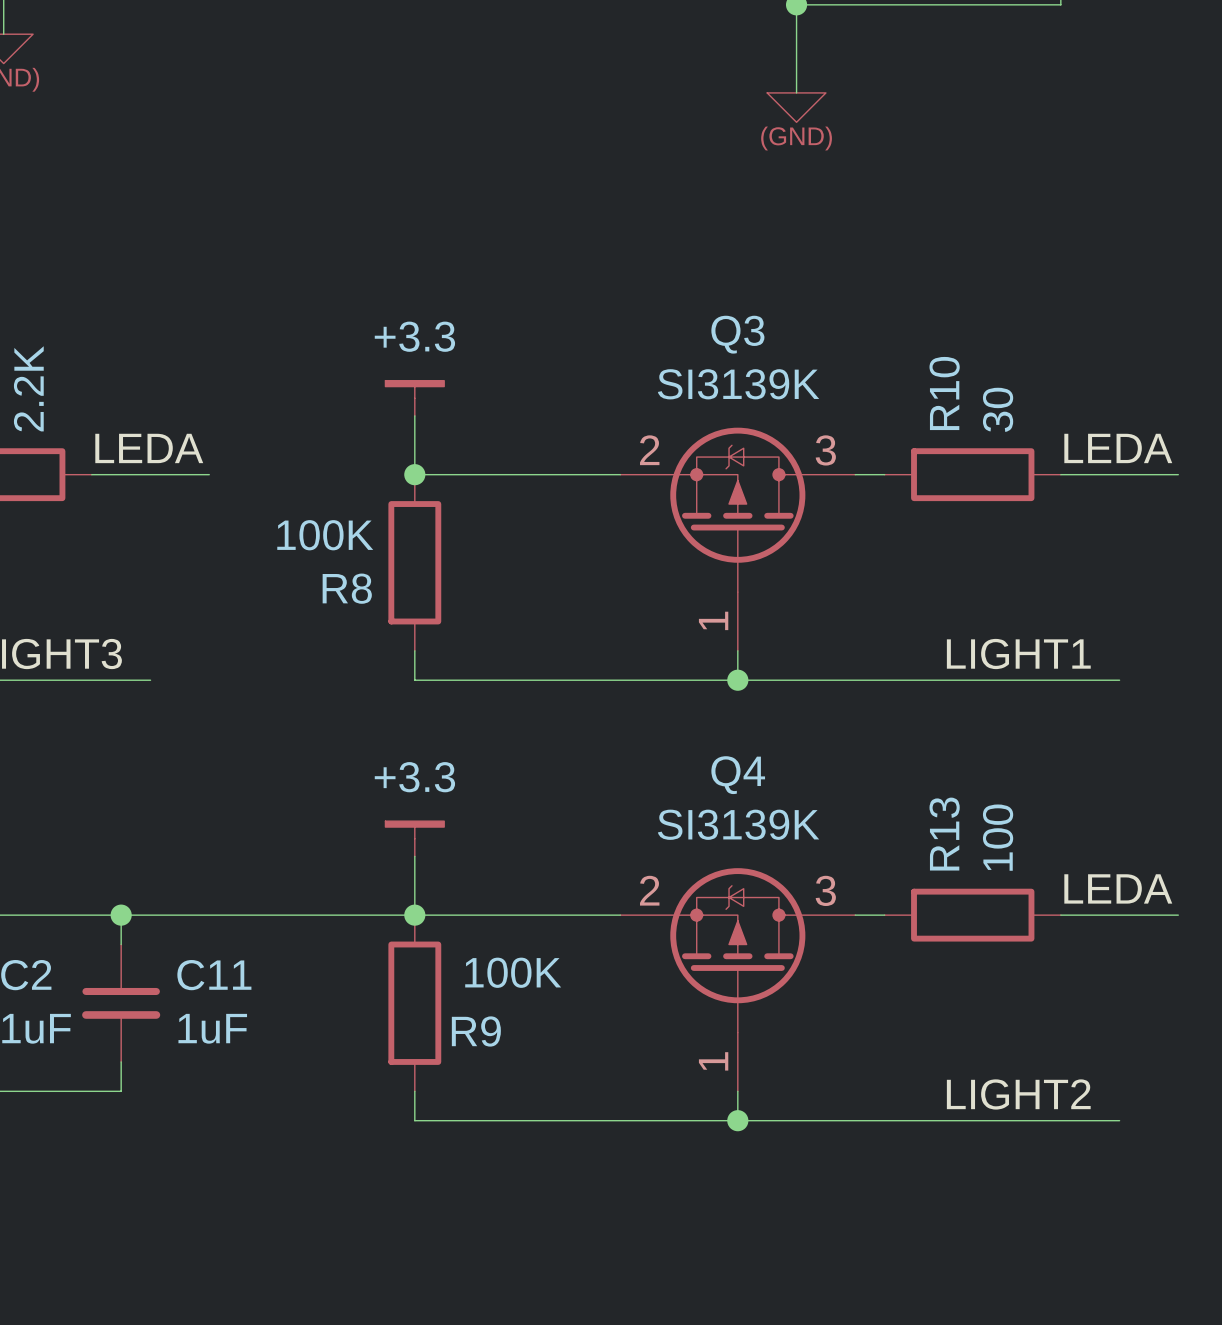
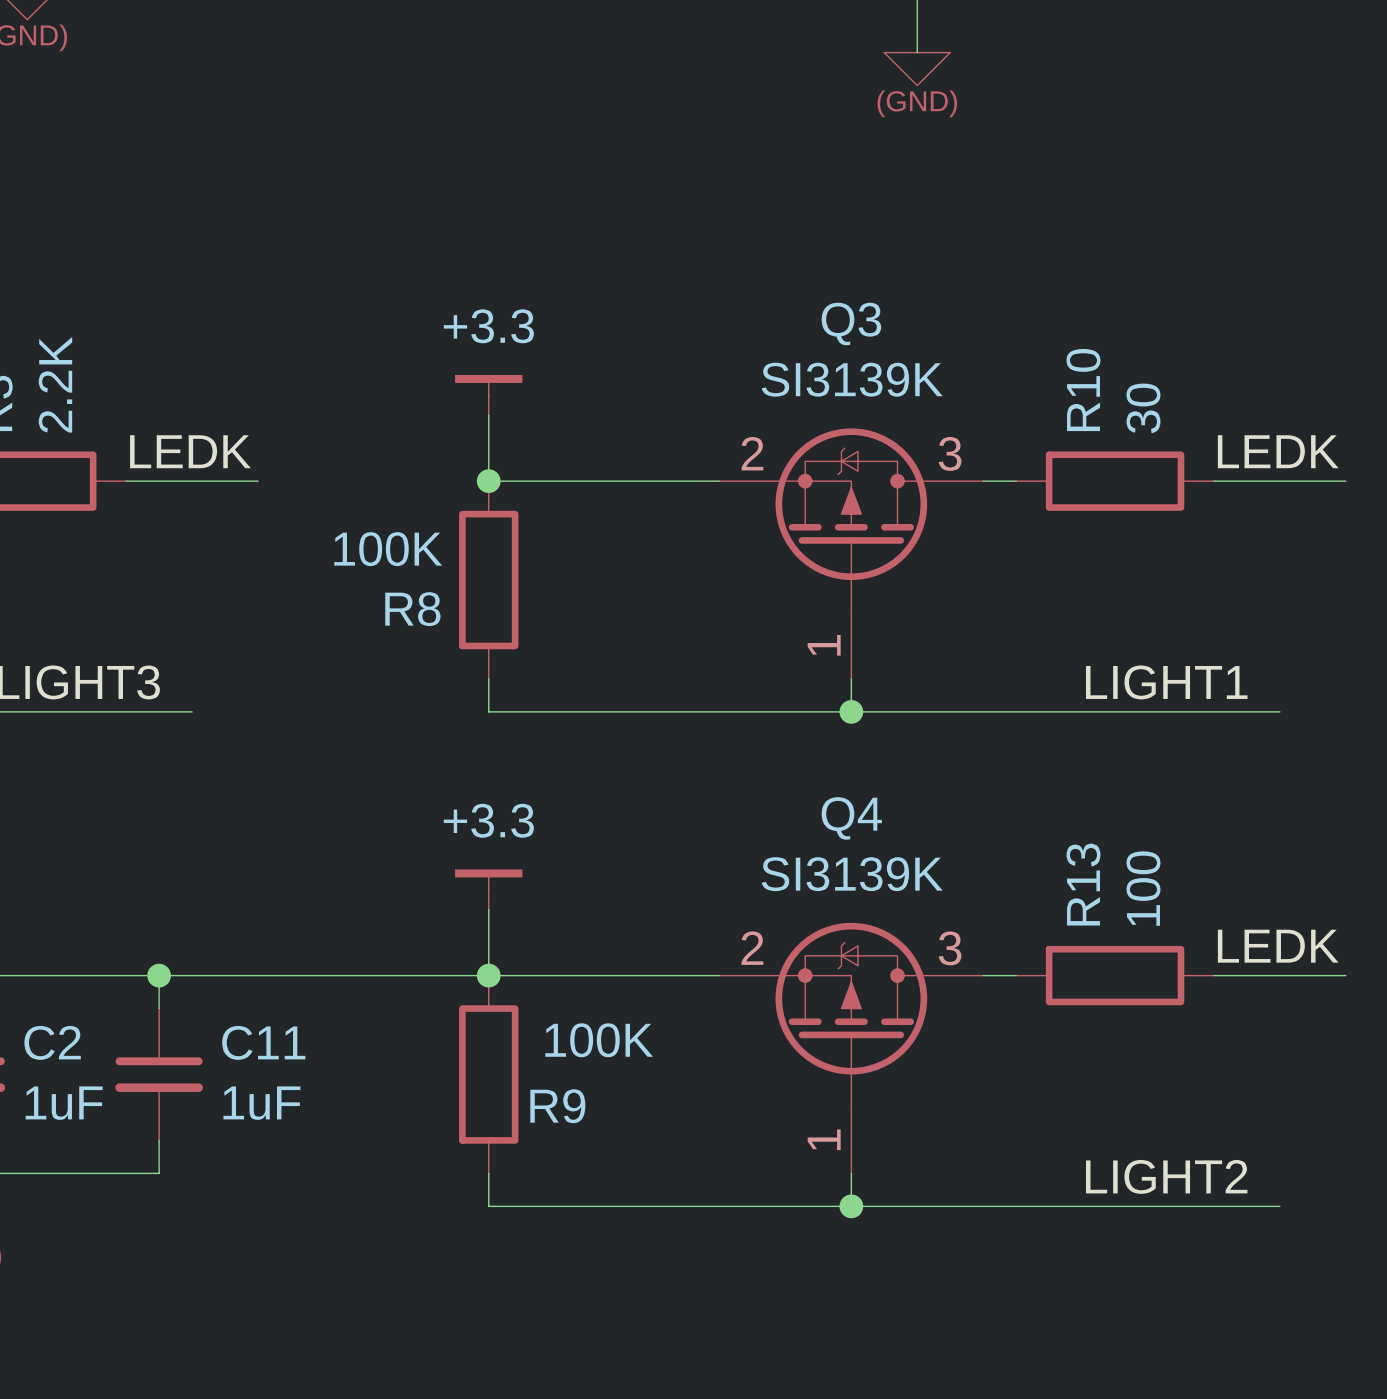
label: LEDA (149, 448) -> LEDK (190, 451)
label: LEDA (1118, 448) -> LEDK (1278, 451)
label: LEDA (1118, 888) -> LEDK (1278, 946)

